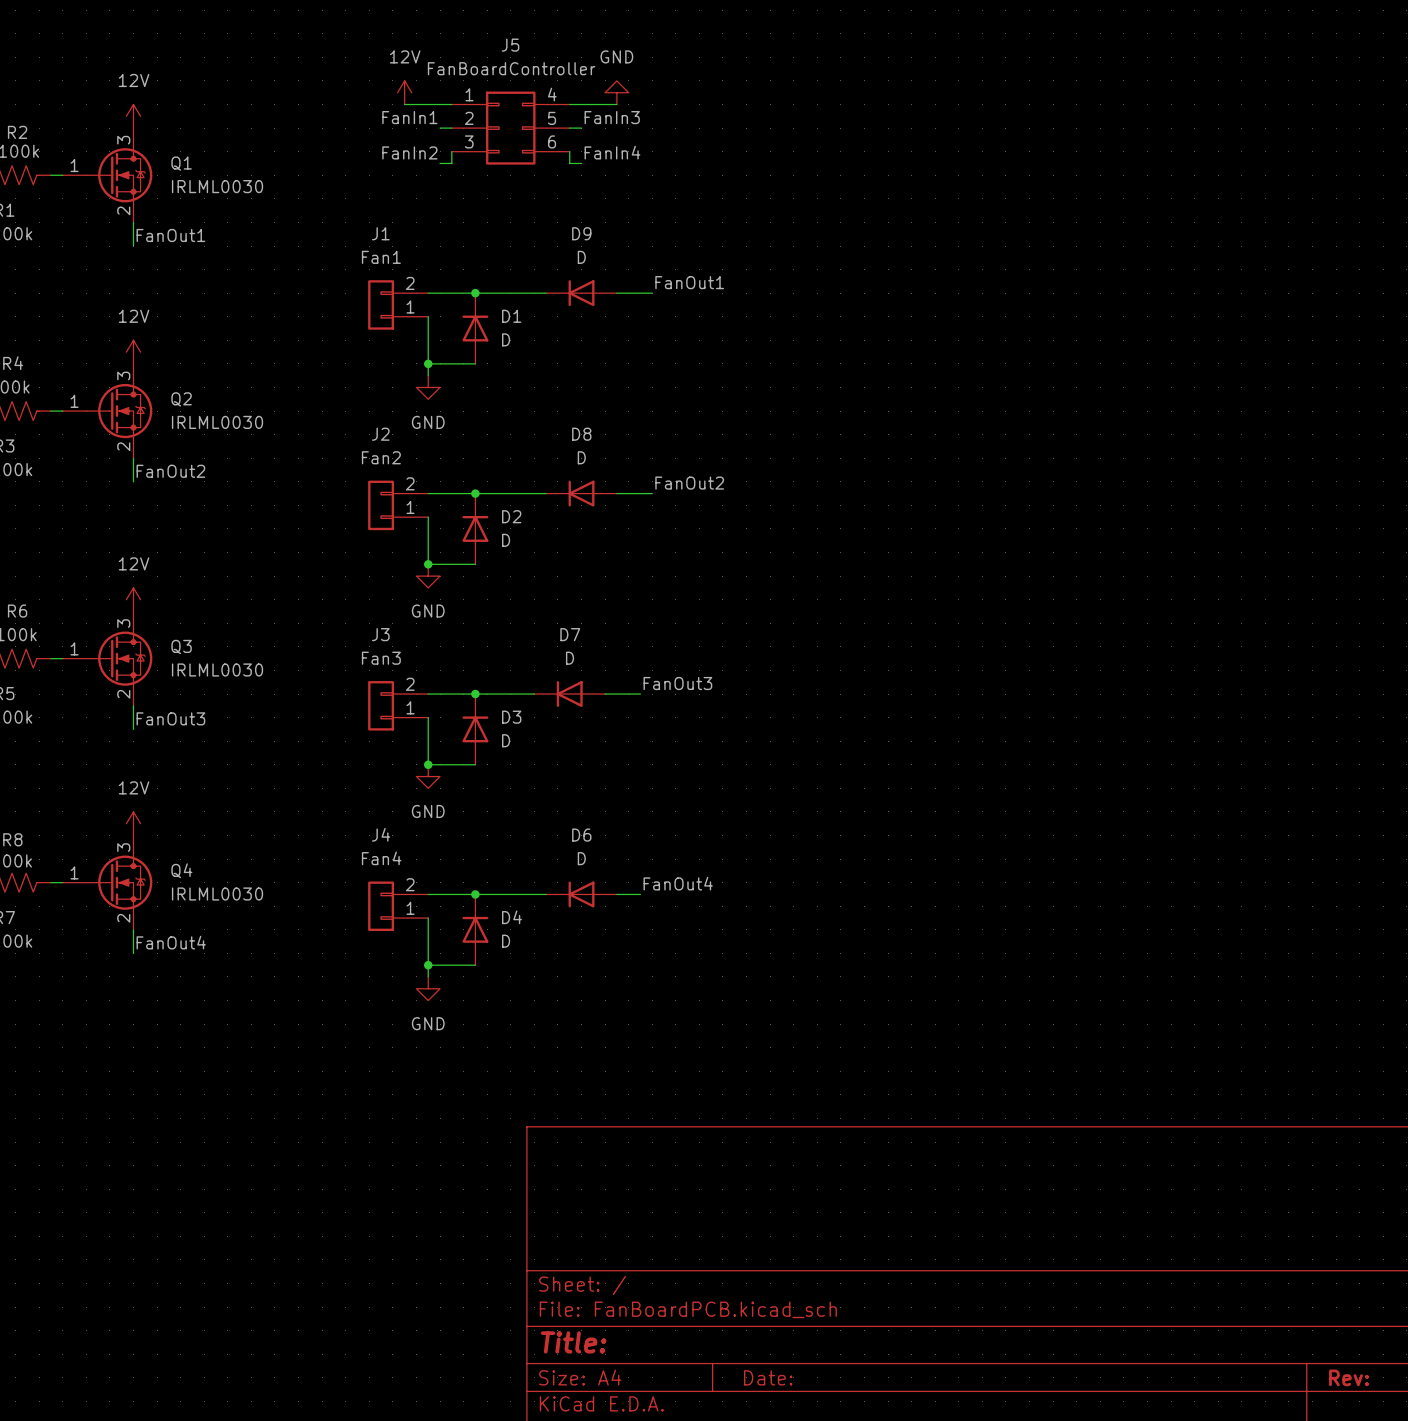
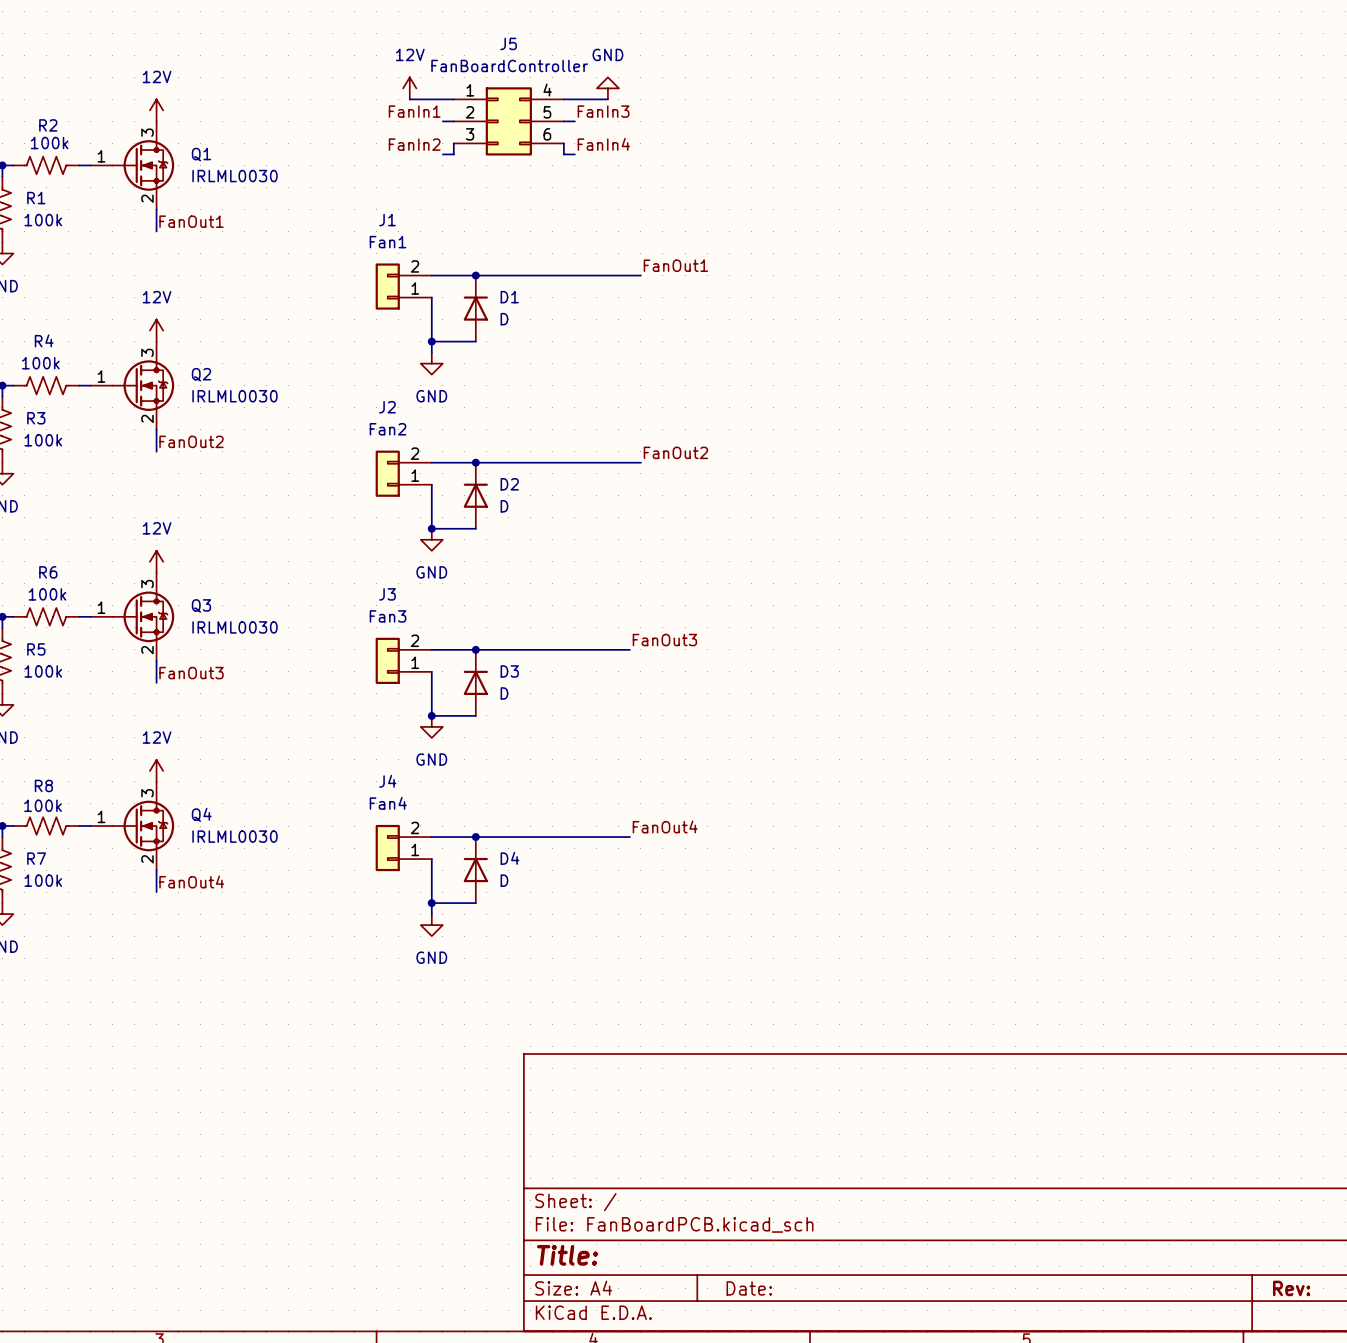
D9: D (581, 293) -> none
D8: D (581, 493) -> none
D7: D (569, 694) -> none
D6: D (581, 894) -> none

